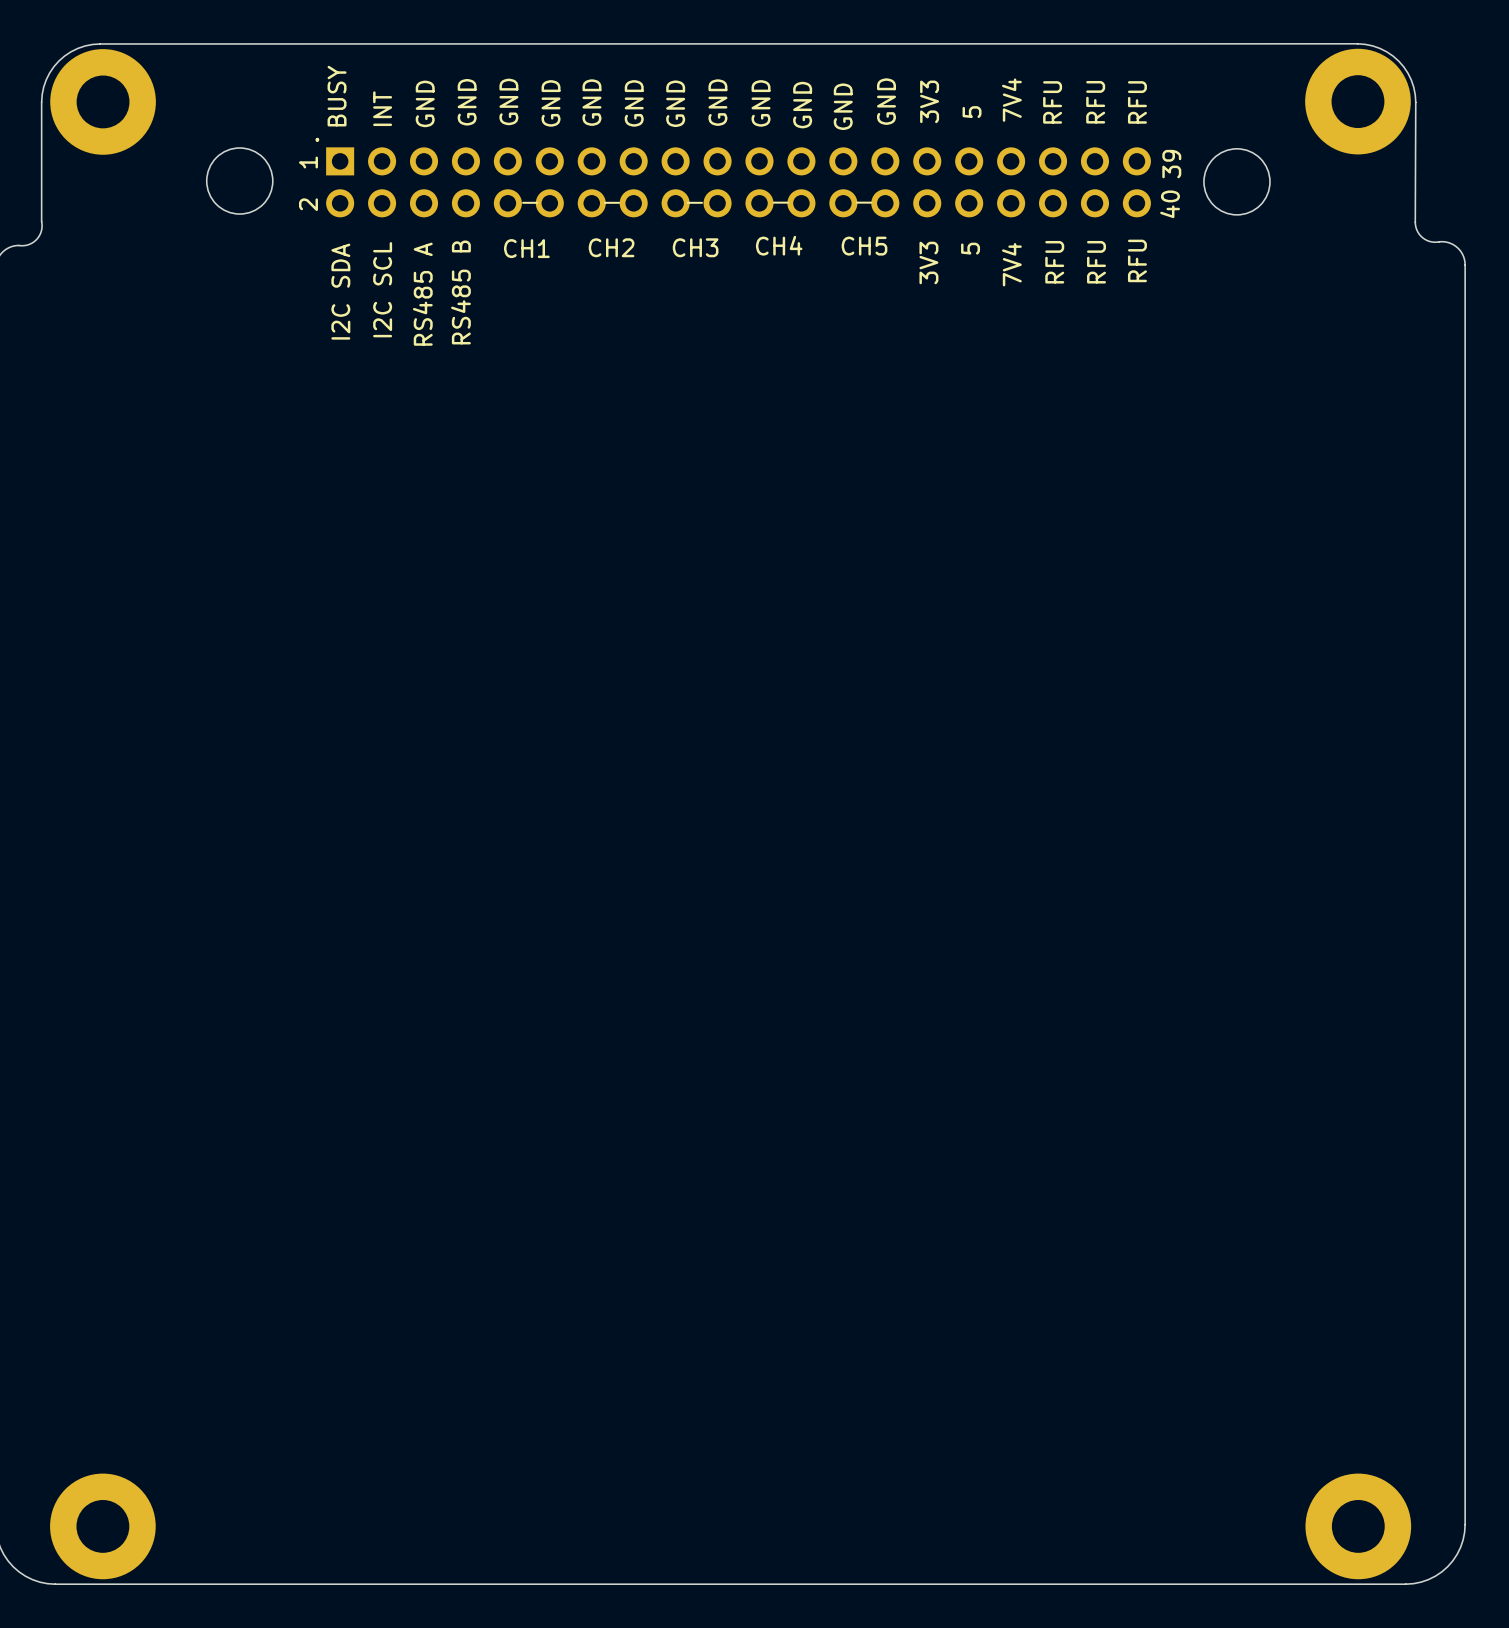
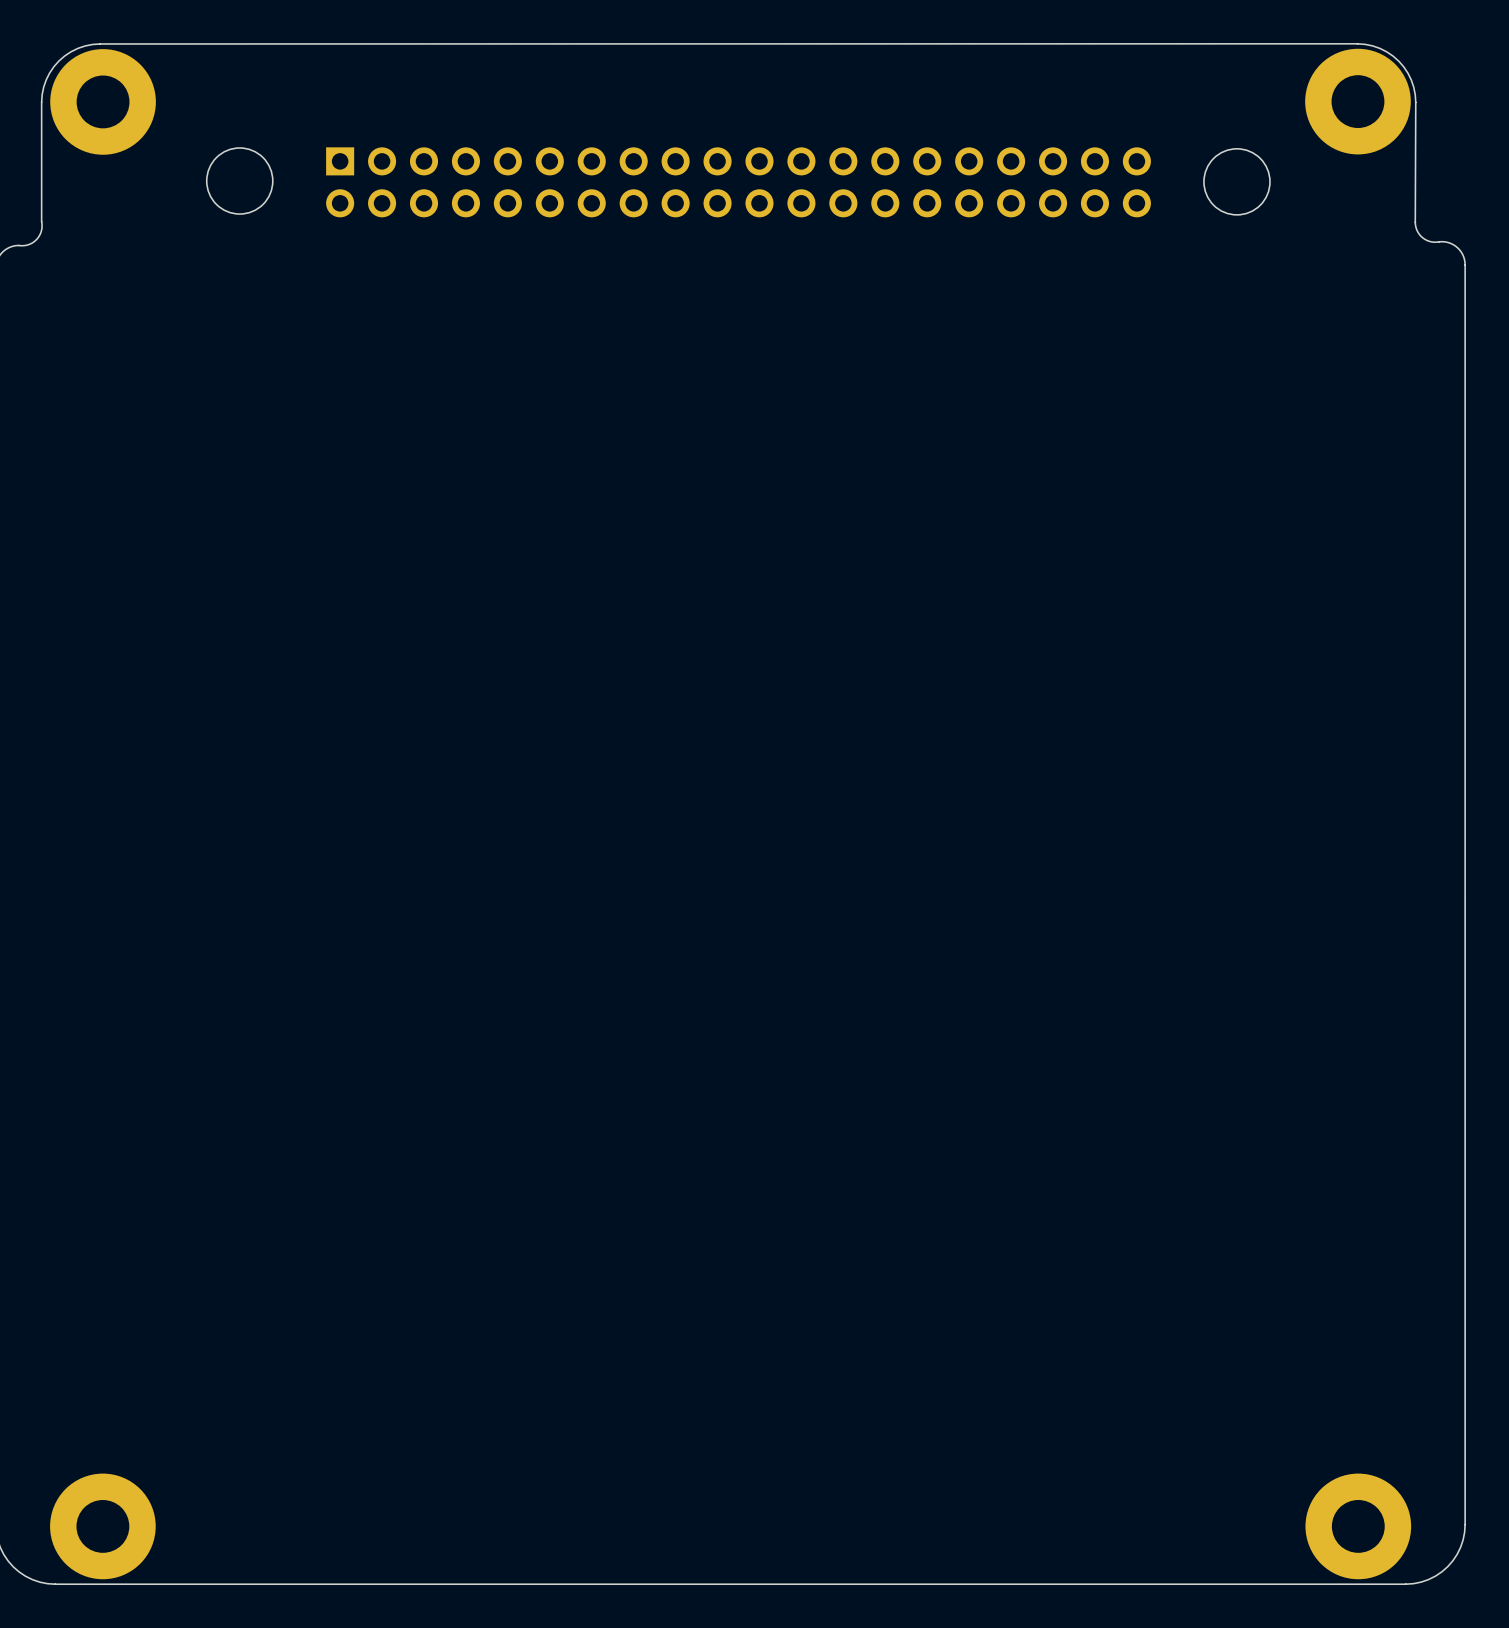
text: BUSY (337, 96) -> none
text: 7V4 (1011, 100) -> none
text: GND (508, 101) -> none
text: GND (886, 101) -> none
text: 3V3 (929, 101) -> none
text: GND (467, 102) -> none
text: GND (591, 102) -> none
text: GND (717, 102) -> none
text: RFU (1052, 102) -> none
text: RFU (1095, 102) -> none
text: RFU (1137, 102) -> none
text: GND (425, 103) -> none
text: GND (551, 103) -> none
text: GND (634, 103) -> none
text: GND (675, 103) -> none
text: GND (761, 103) -> none
text: GND (802, 105) -> none
text: GND (843, 106) -> none
text: INT (382, 108) -> none
text: 5 (972, 112) -> none
text: . (317, 139) -> none
text: 1 (308, 162) -> none
text: 39 (1171, 164) -> none
line: (537, 202) (523, 202) -> none
line: (619, 202) (604, 202) -> none
line: (702, 202) (687, 202) -> none
line: (787, 202) (773, 202) -> none
line: (871, 202) (857, 202) -> none
text: 2 (308, 204) -> none
text: 40 (1170, 204) -> none
text: CH4 (779, 245) -> none
text: CH5 (864, 246) -> none
text: CH2 (611, 247) -> none
text: CH3 (695, 247) -> none
text: CH1 (526, 248) -> none
text: 5 (970, 248) -> none
text: RFU (1137, 260) -> none
text: 3V3 (928, 262) -> none
text: RFU (1054, 262) -> none
text: RFU (1096, 262) -> none
text: 7V4 (1011, 264) -> none
text: I2C SCL (382, 289) -> none
text: I2C SDA (340, 291) -> none
text: RS485 B (460, 292) -> none
text: RS485 A (422, 294) -> none

